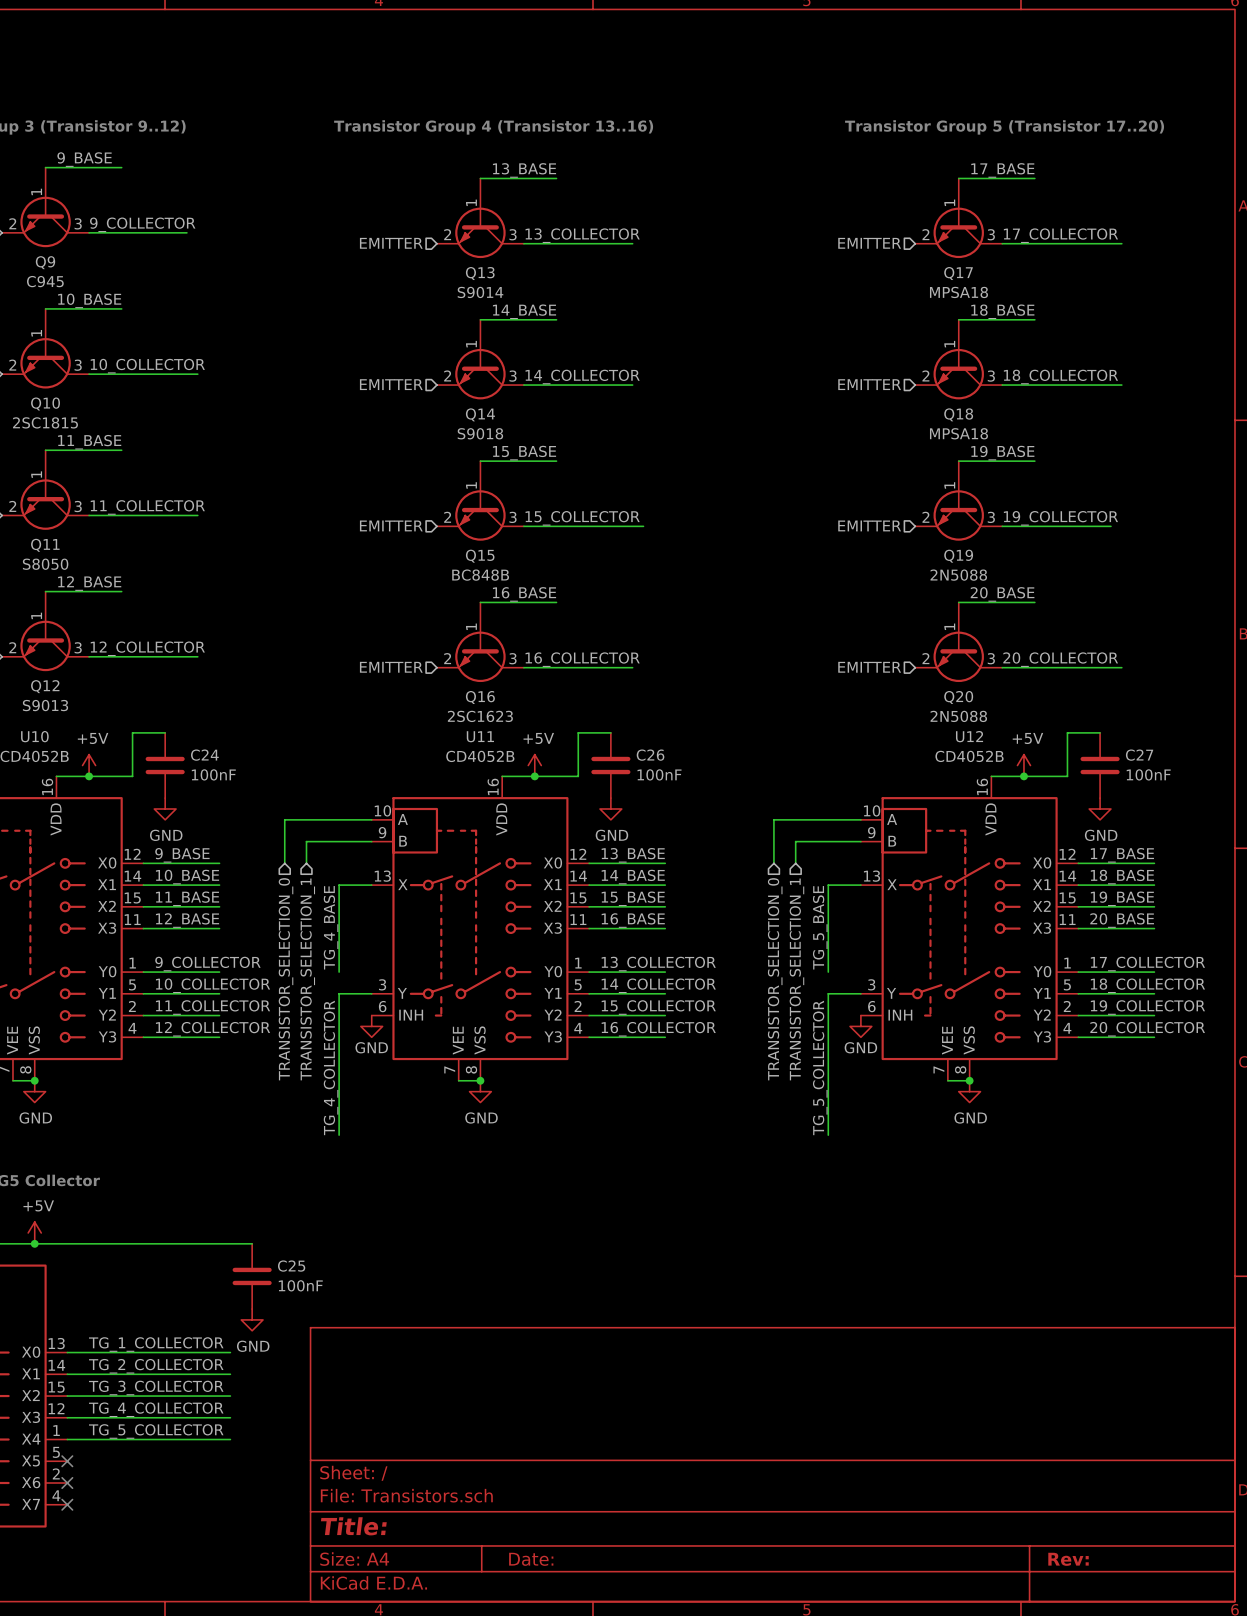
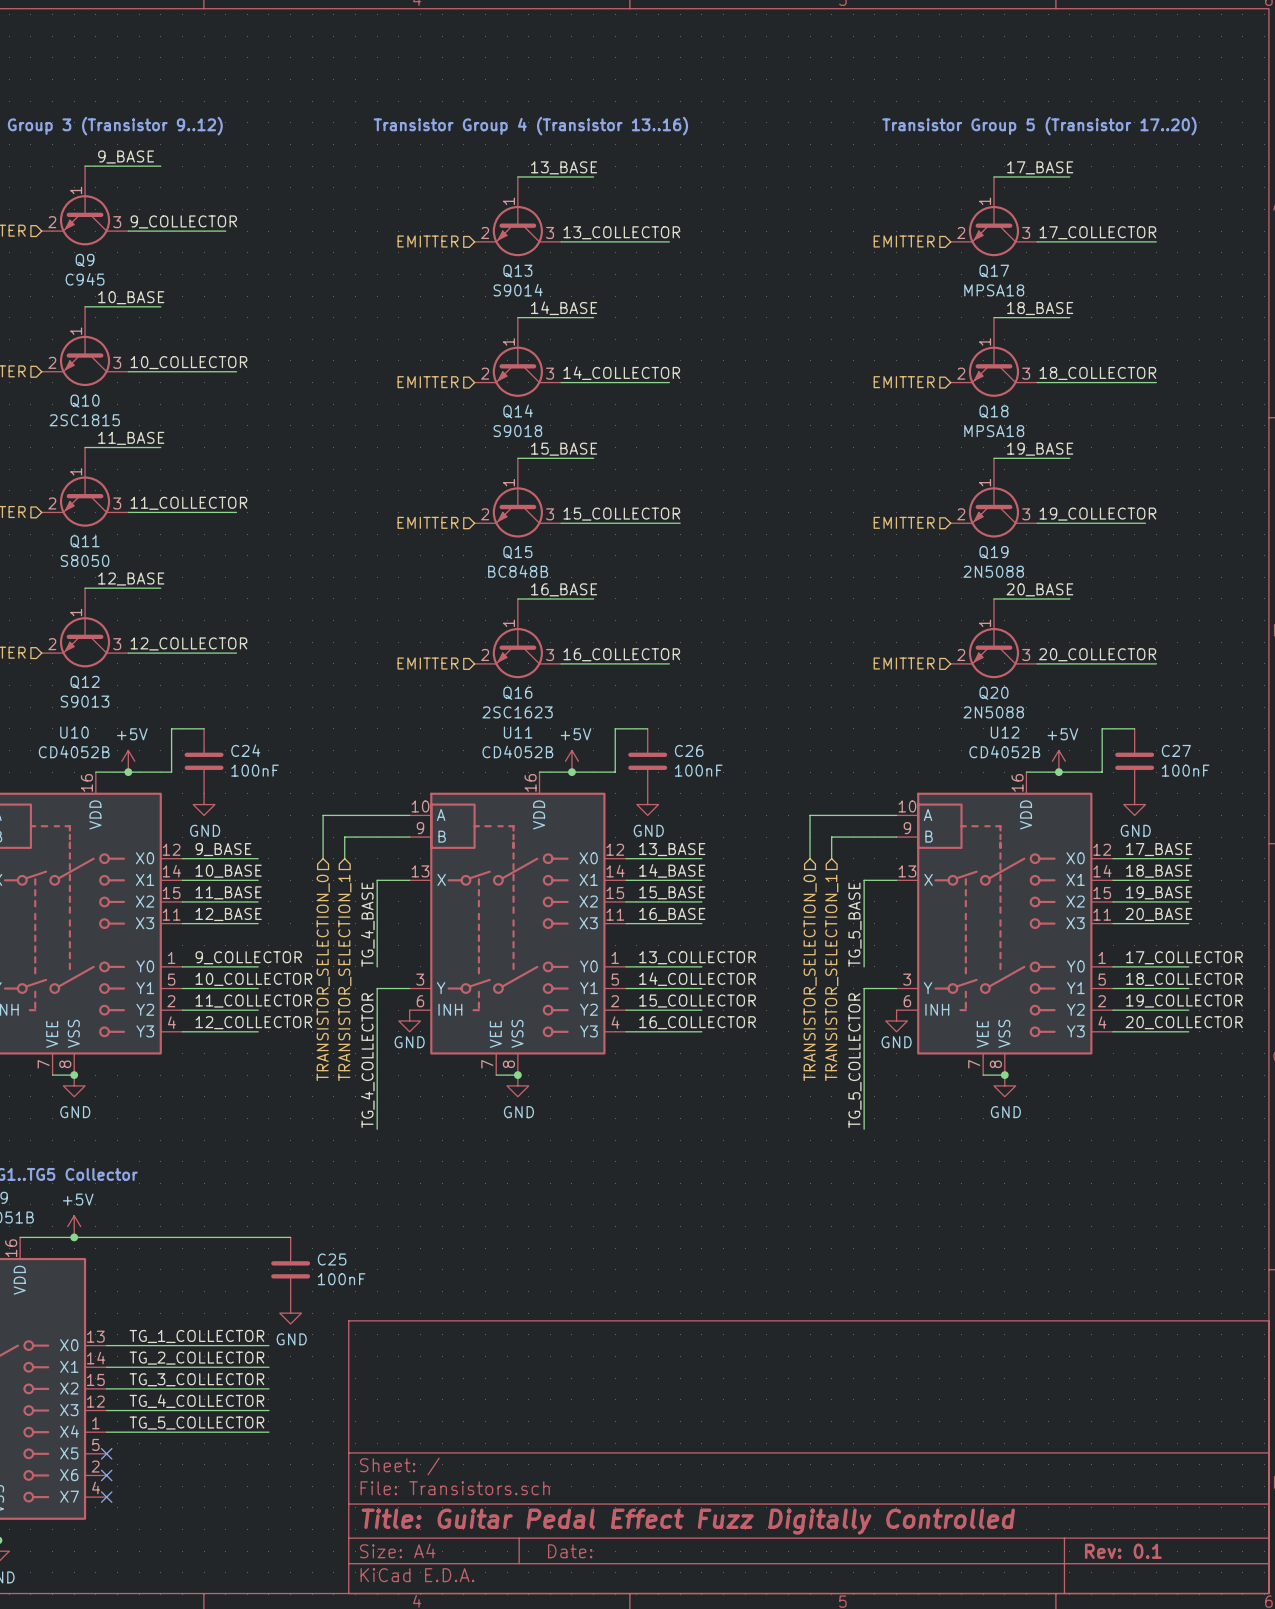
title block: Title: (353, 1526) -> Title: Guitar Pedal Effect Fuzz Digitally Controlled (688, 1521)
title block: Rev: (1068, 1559) -> Rev: 0.1 (1123, 1551)

